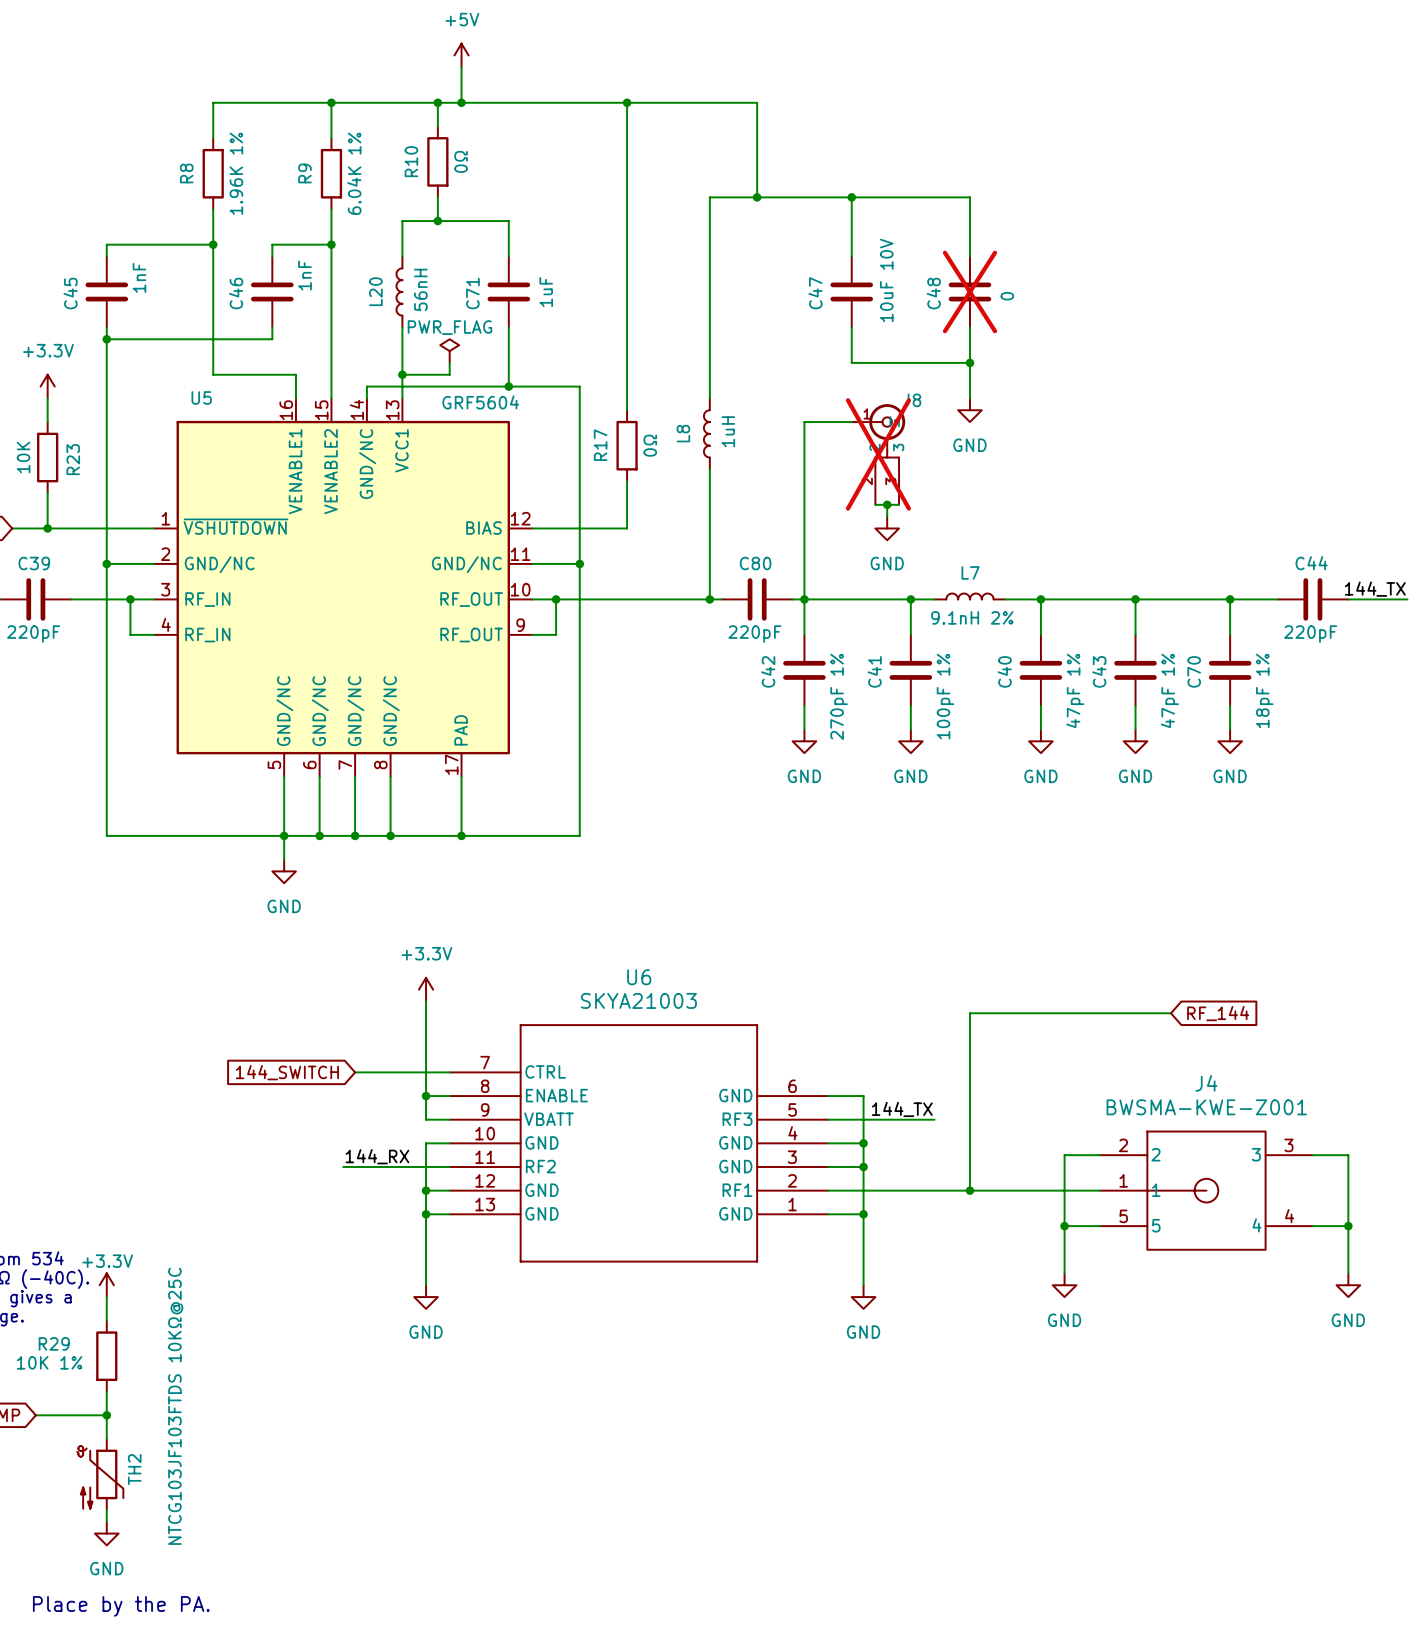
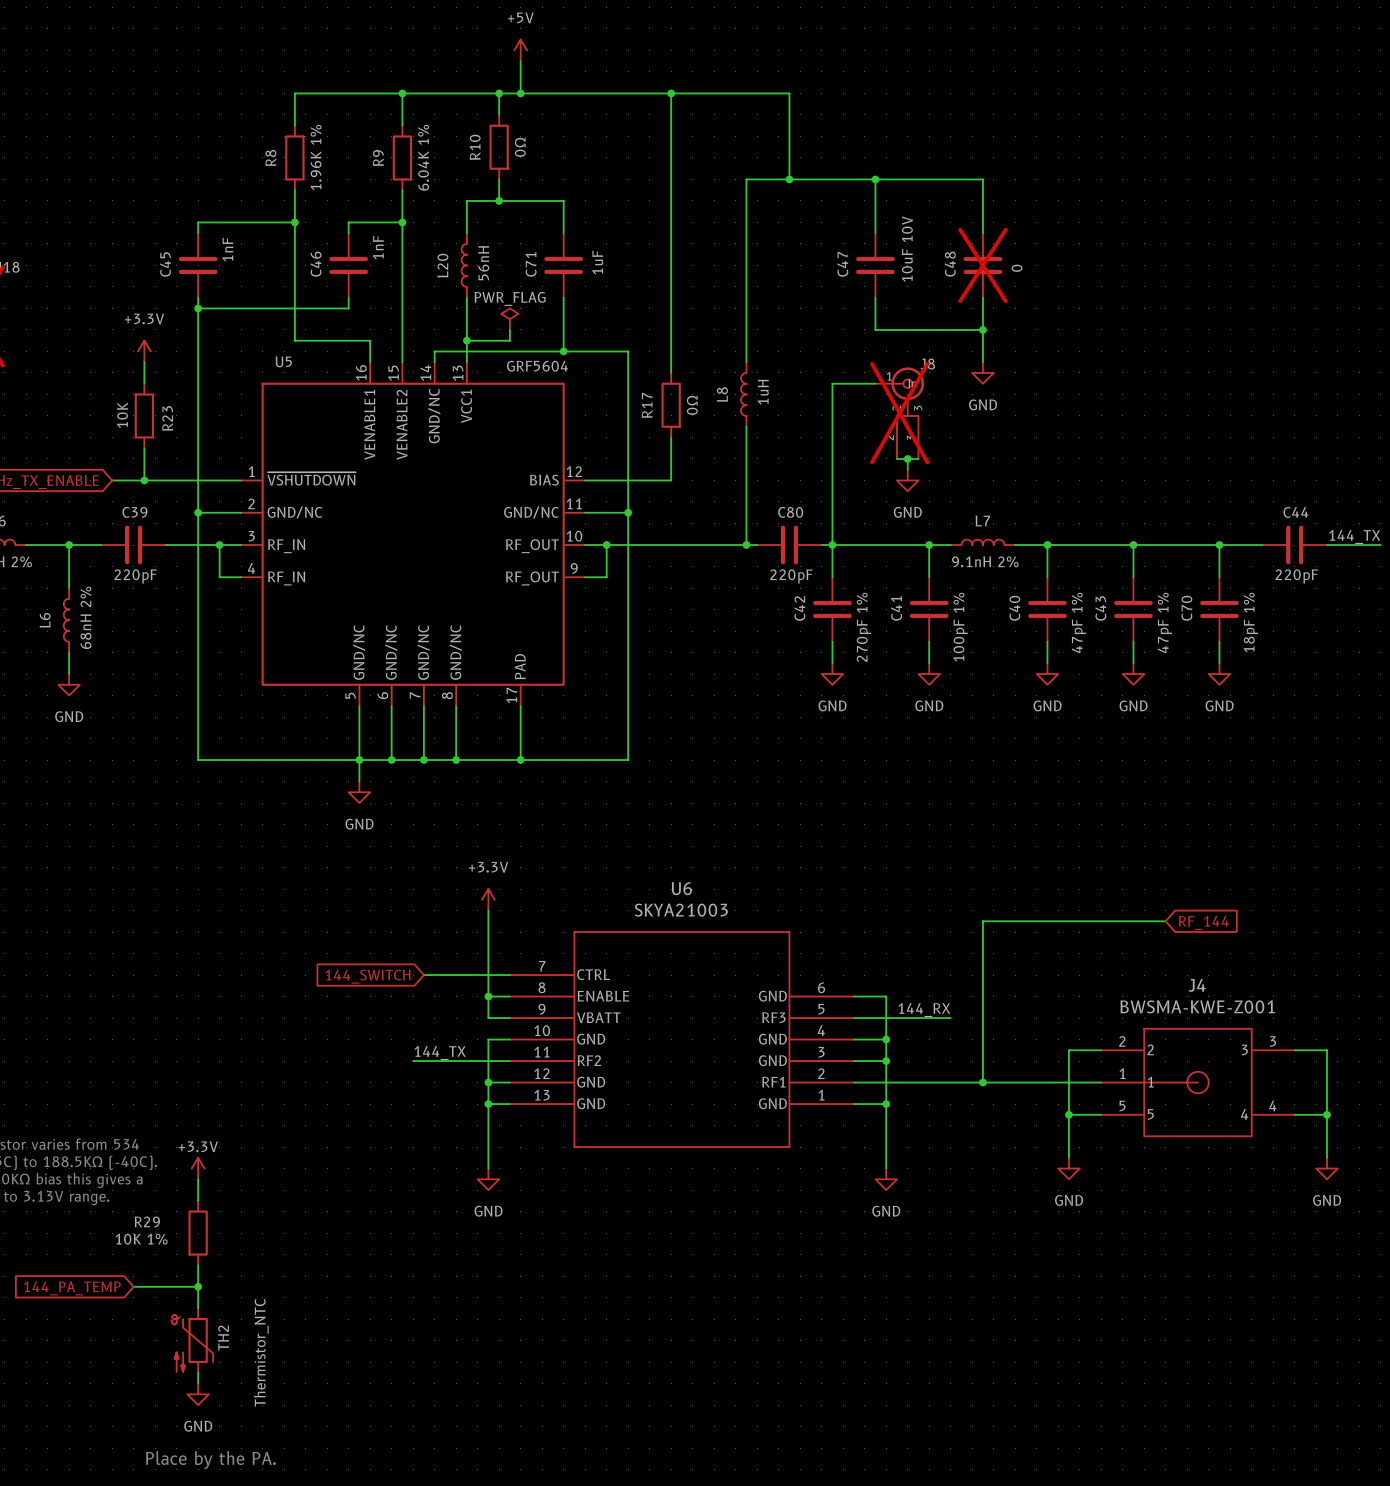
label: 144_TX (902, 1109) -> 144_RX (924, 1010)
label: 144_RX (377, 1156) -> 144_TX (440, 1053)
TH2 value: NTCG103JF103FTDS 10KΩ@25C (175, 1406) -> Thermistor_NTC (261, 1352)

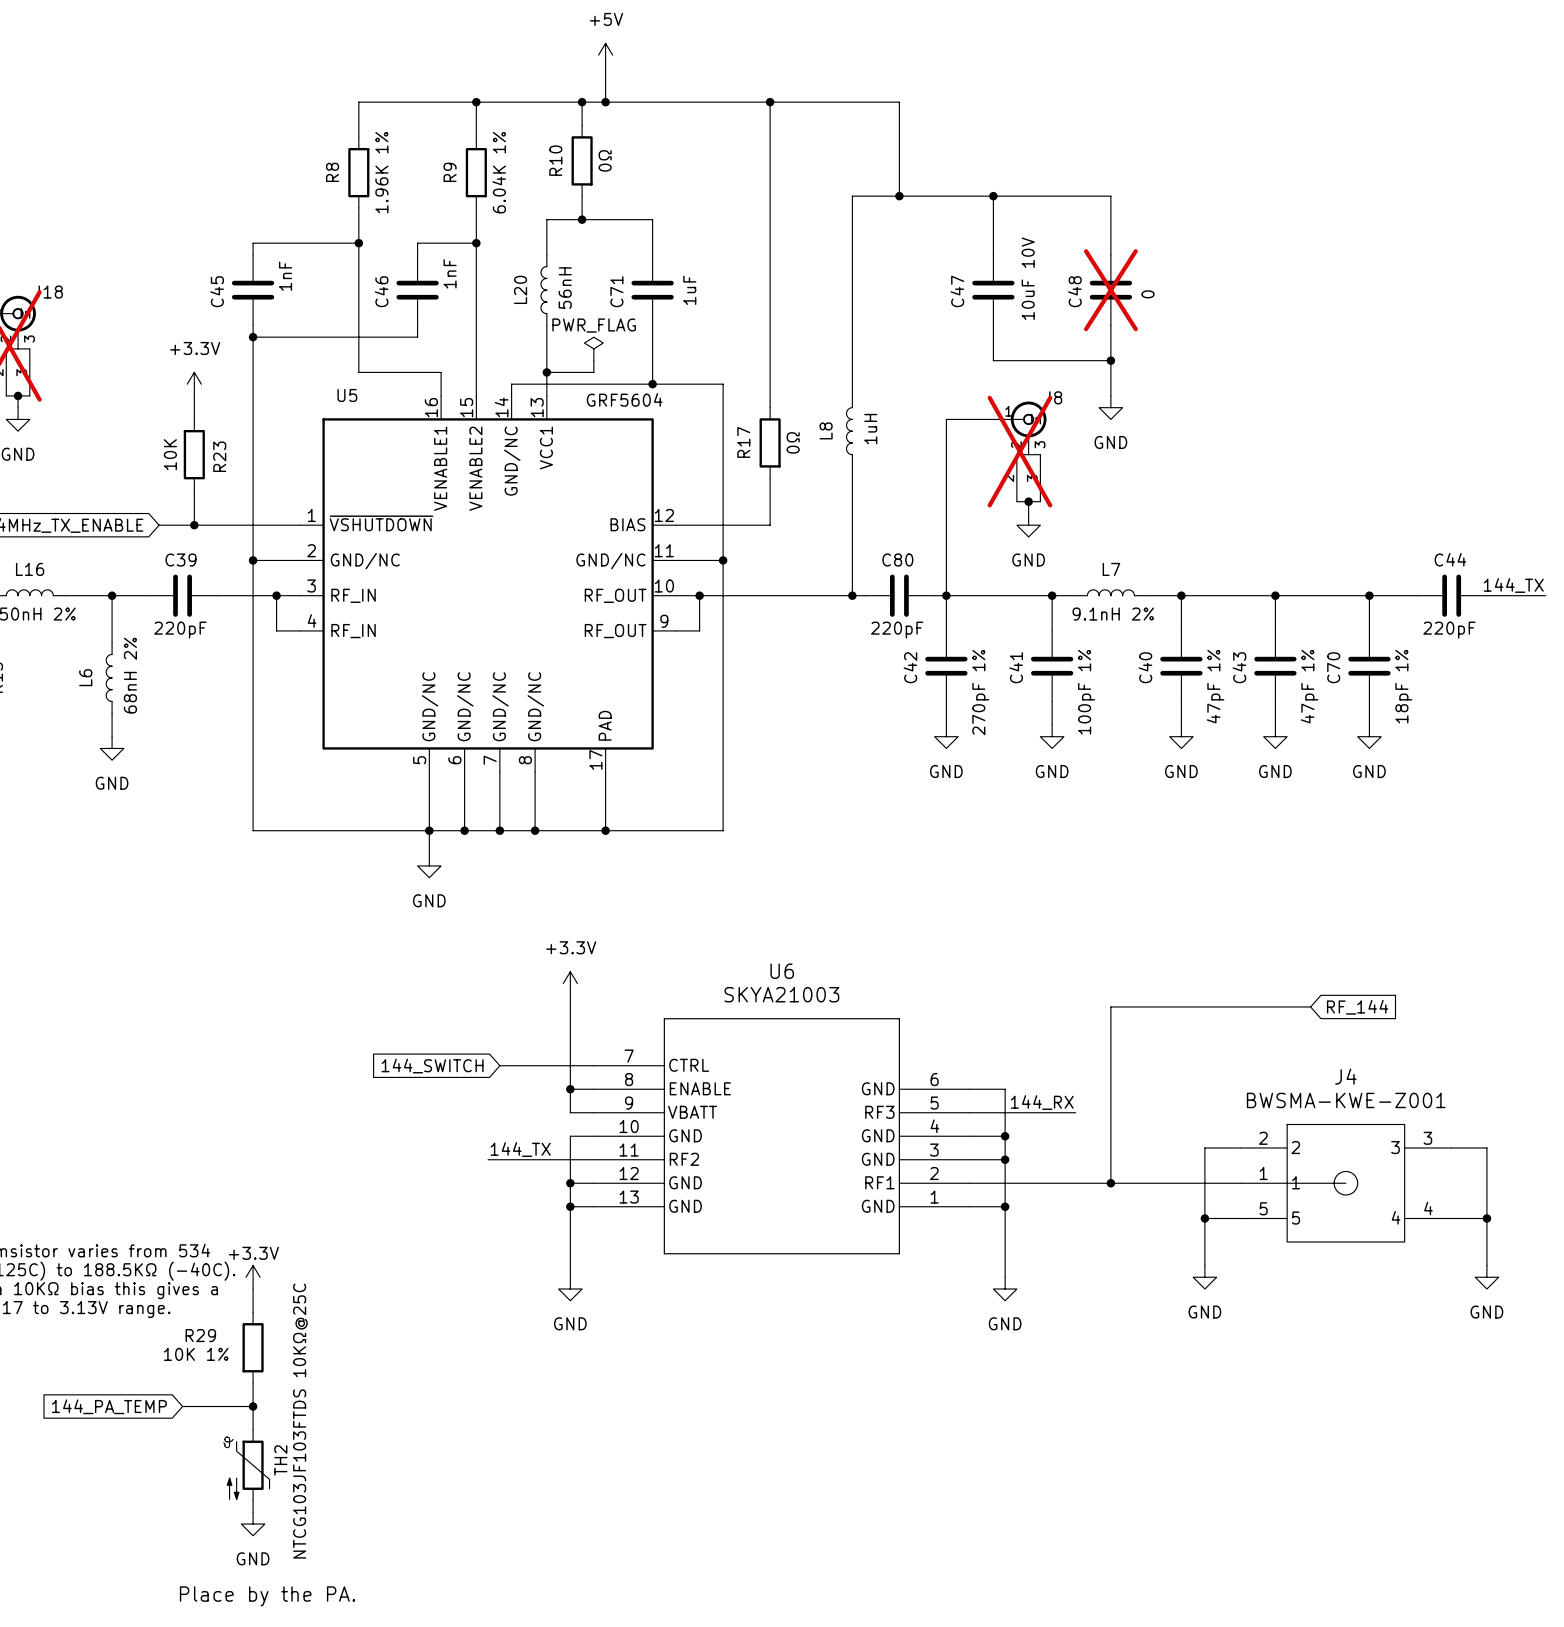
TH2 value: Thermistor_NTC (261, 1352) -> NTCG103JF103FTDS 10KΩ@25C (300, 1421)

